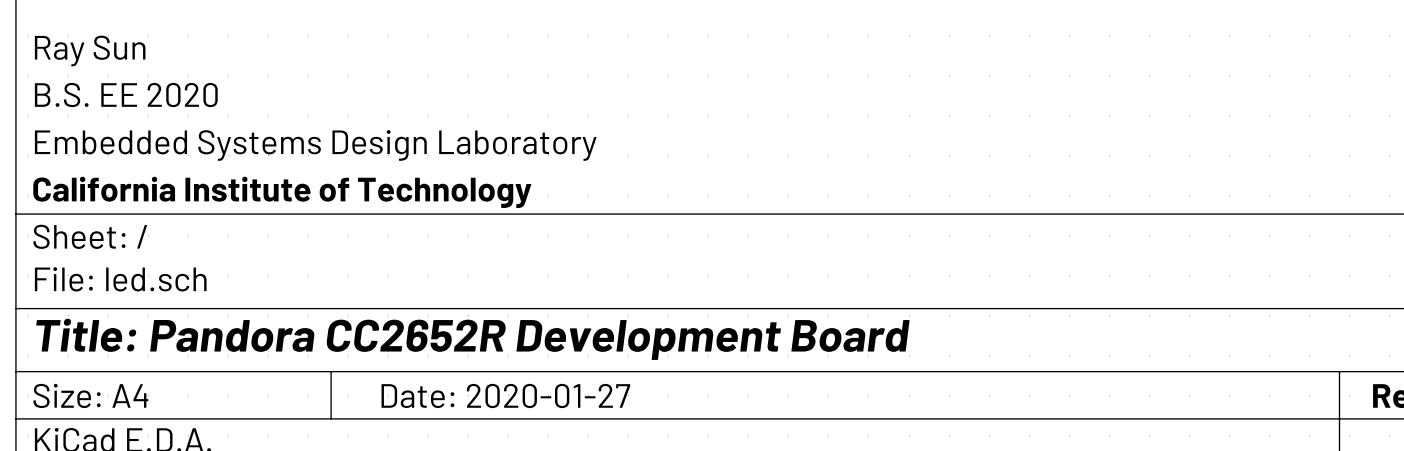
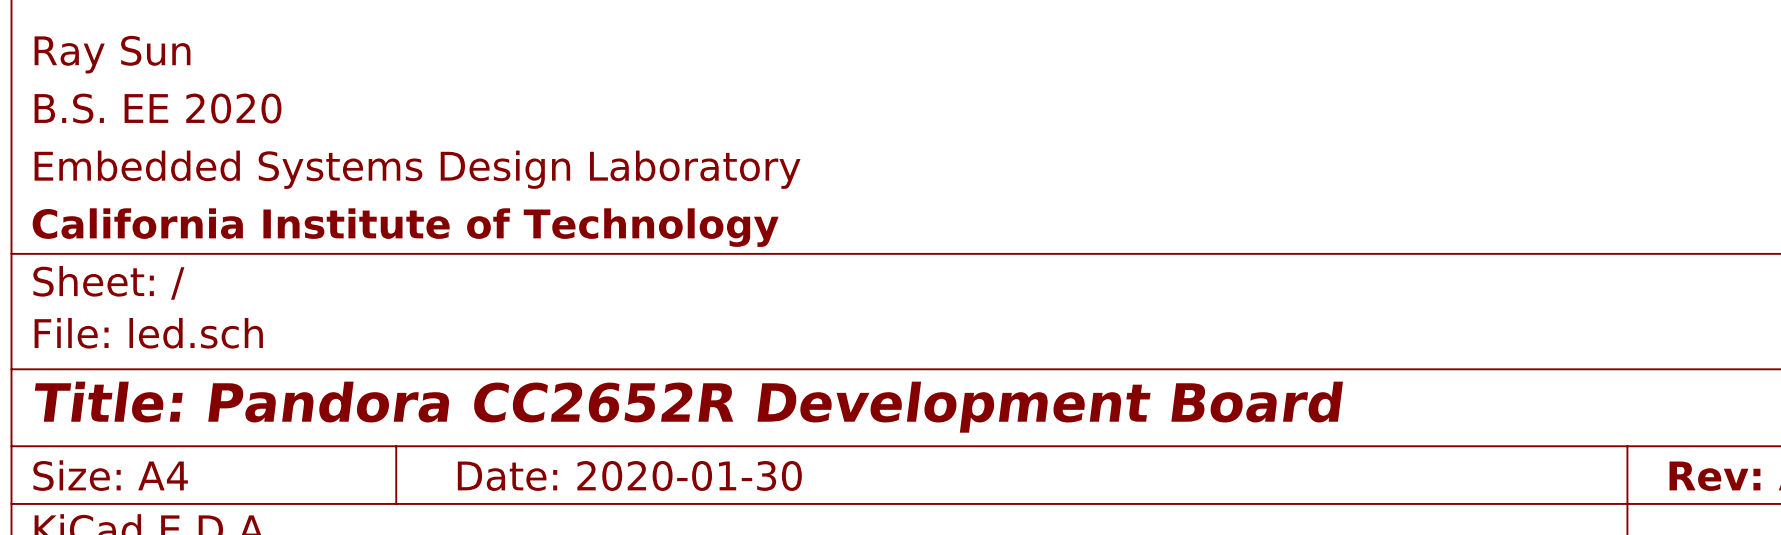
title block: Date: 2020-01-27 (505, 395) -> Date: 2020-01-30 (629, 475)

